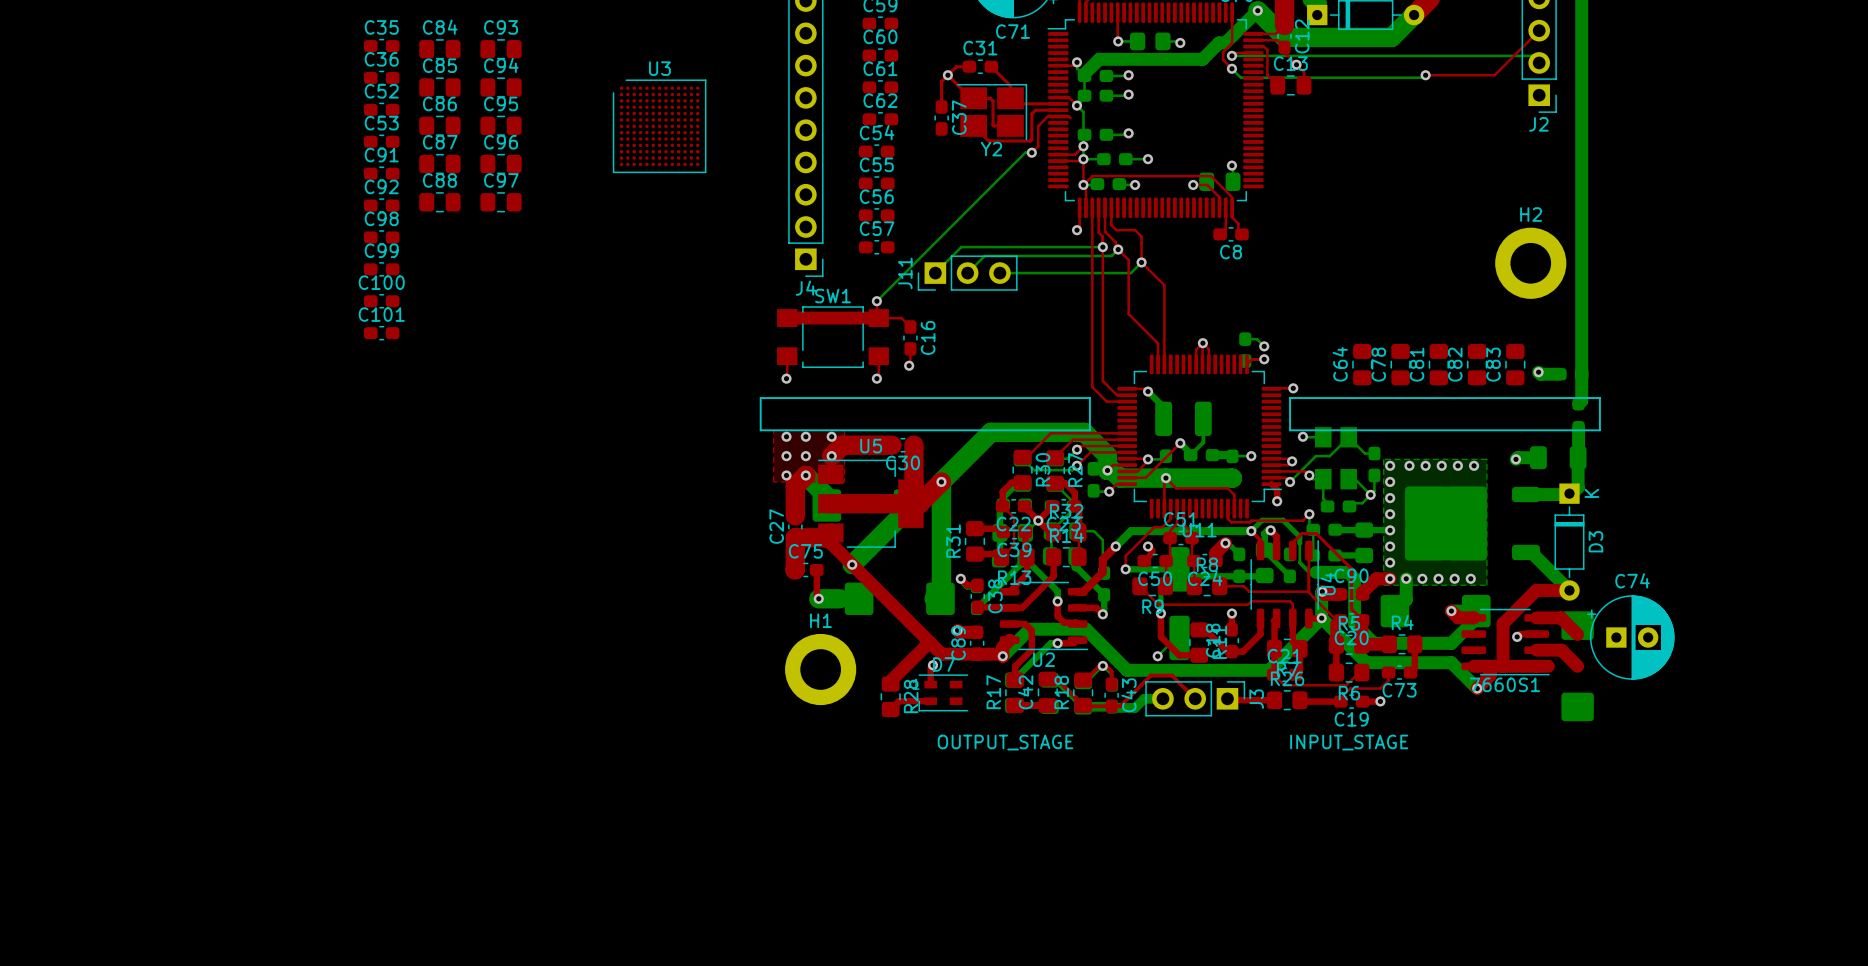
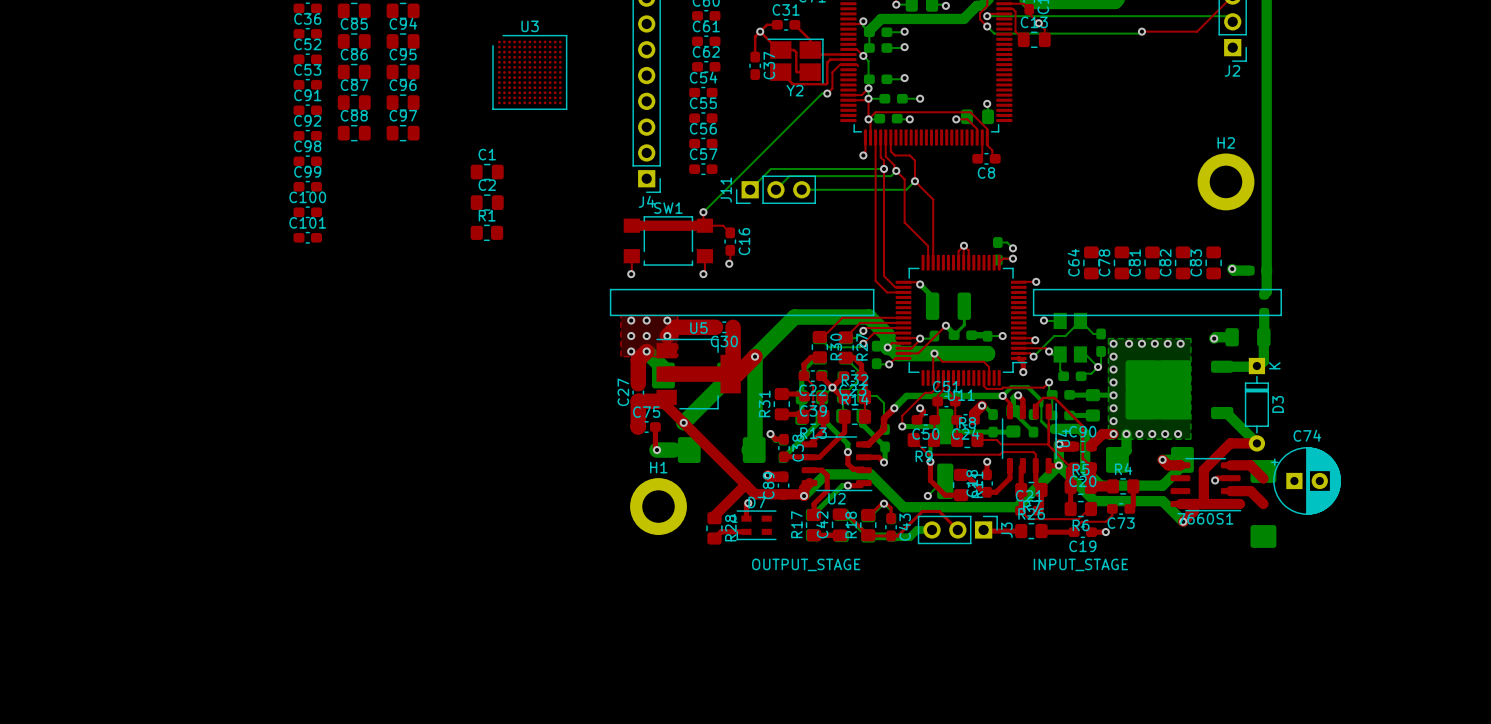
C1: none -> (487, 172)
C2: none -> (487, 202)
R1: none -> (486, 232)

